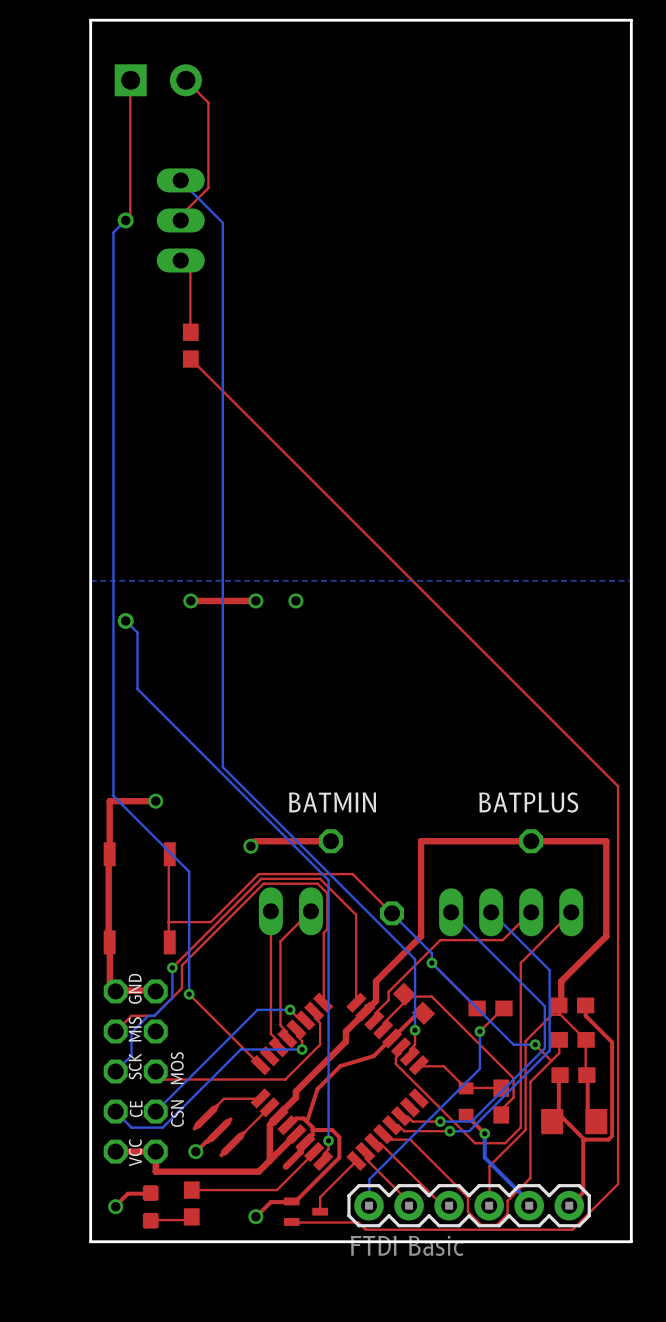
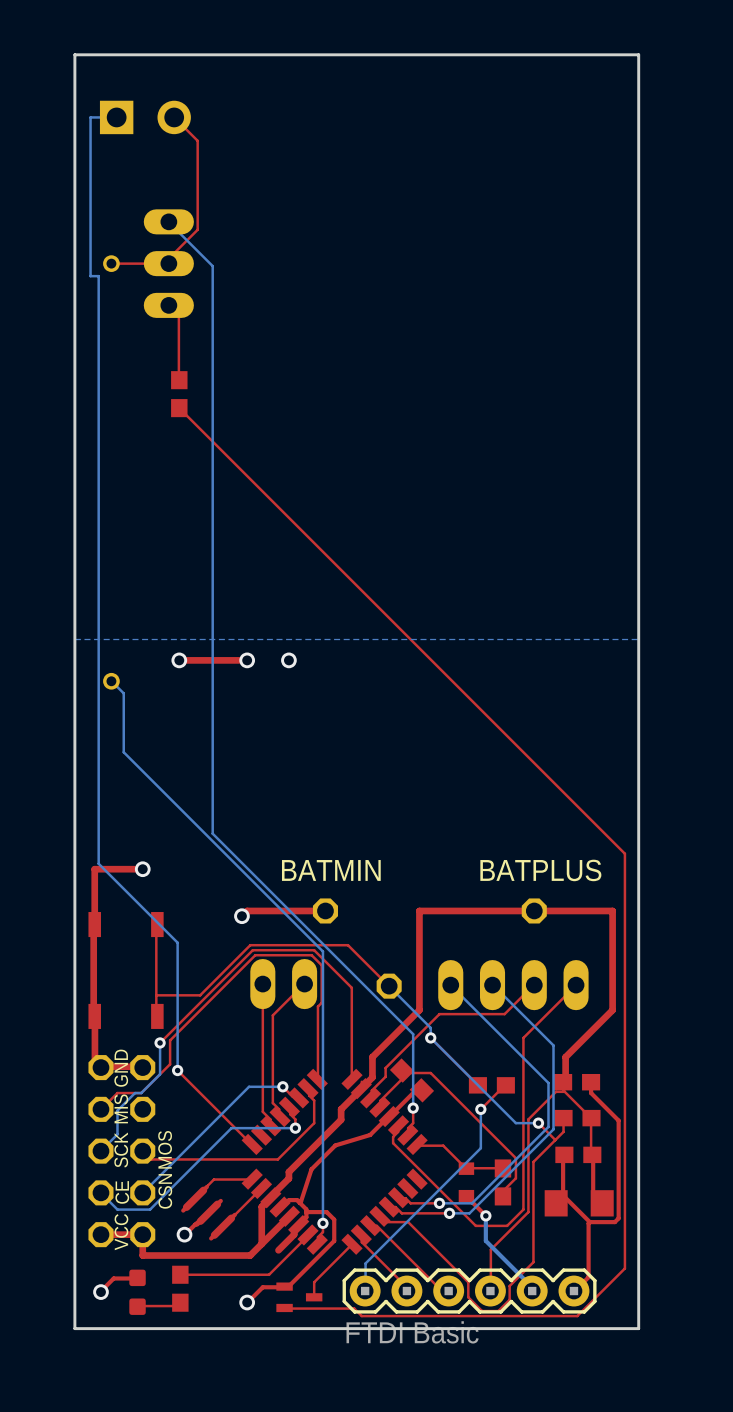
top track: (130, 81) (130, 216) (126, 220) -> (168, 263) (112, 263)
bottom track: (125, 220) (113, 232) -> (116, 117) (90, 117) (90, 276) (98, 276)

